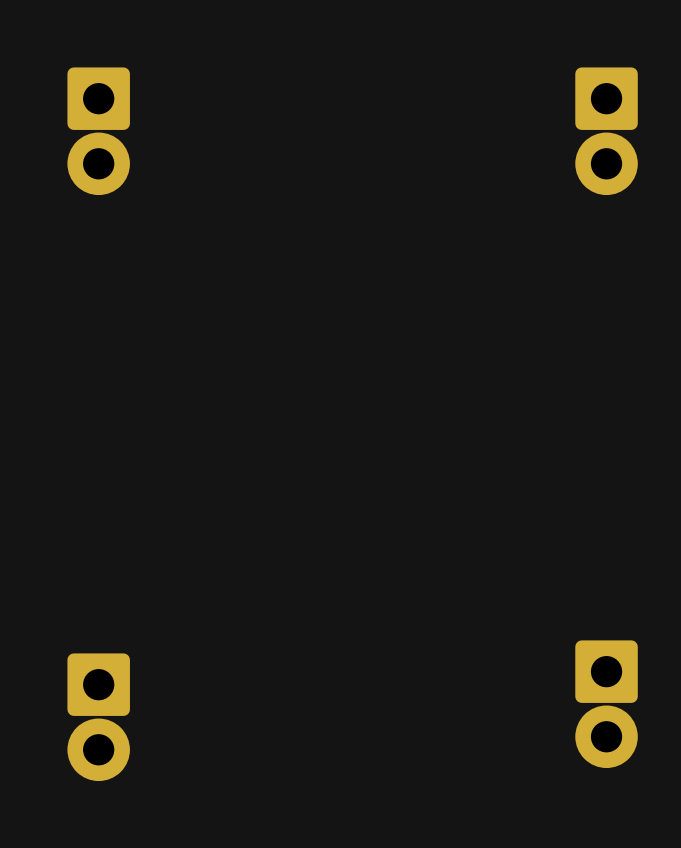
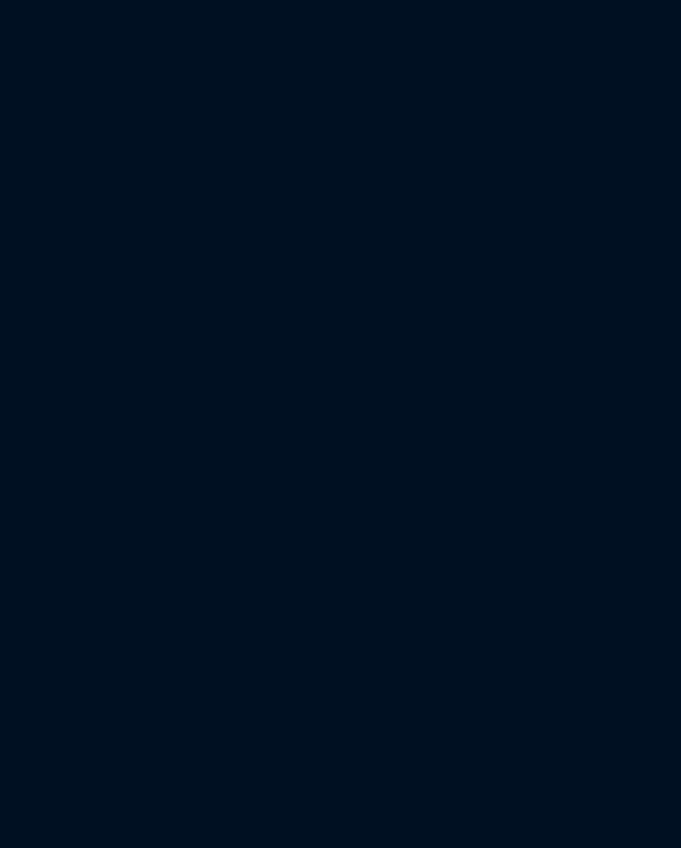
part: (98, 131) -> none
part: (606, 131) -> none
part: (606, 704) -> none
part: (98, 717) -> none

